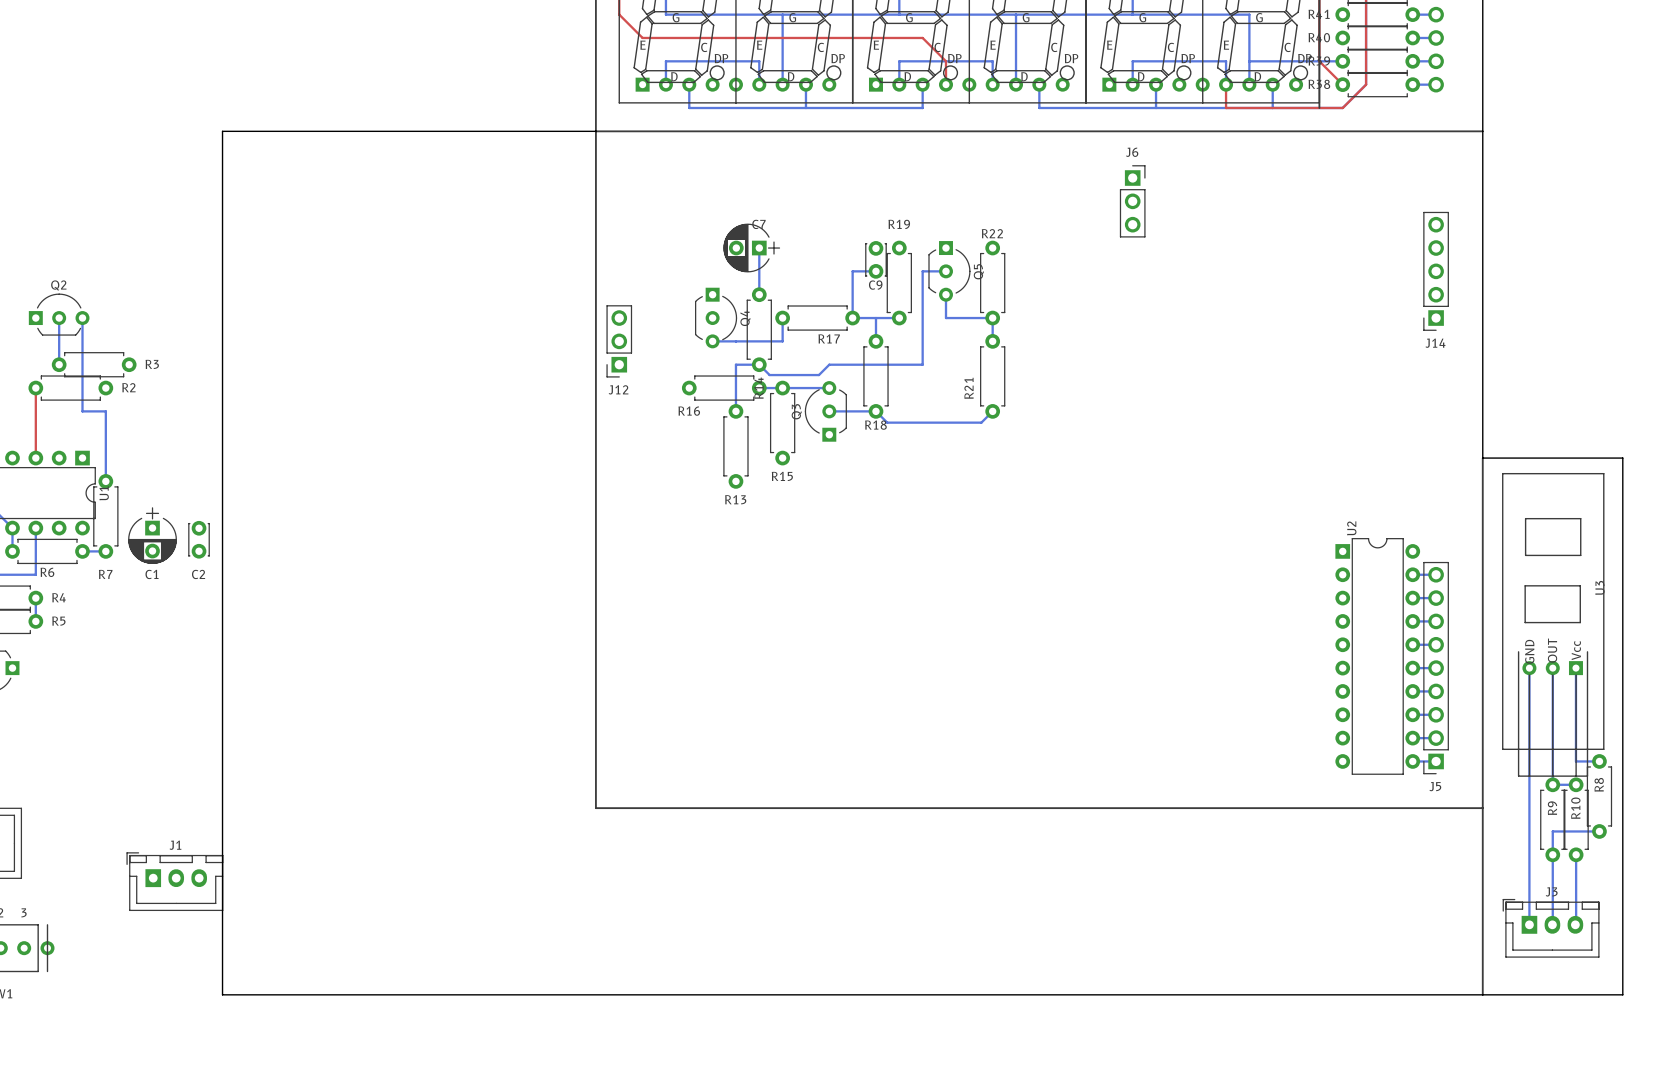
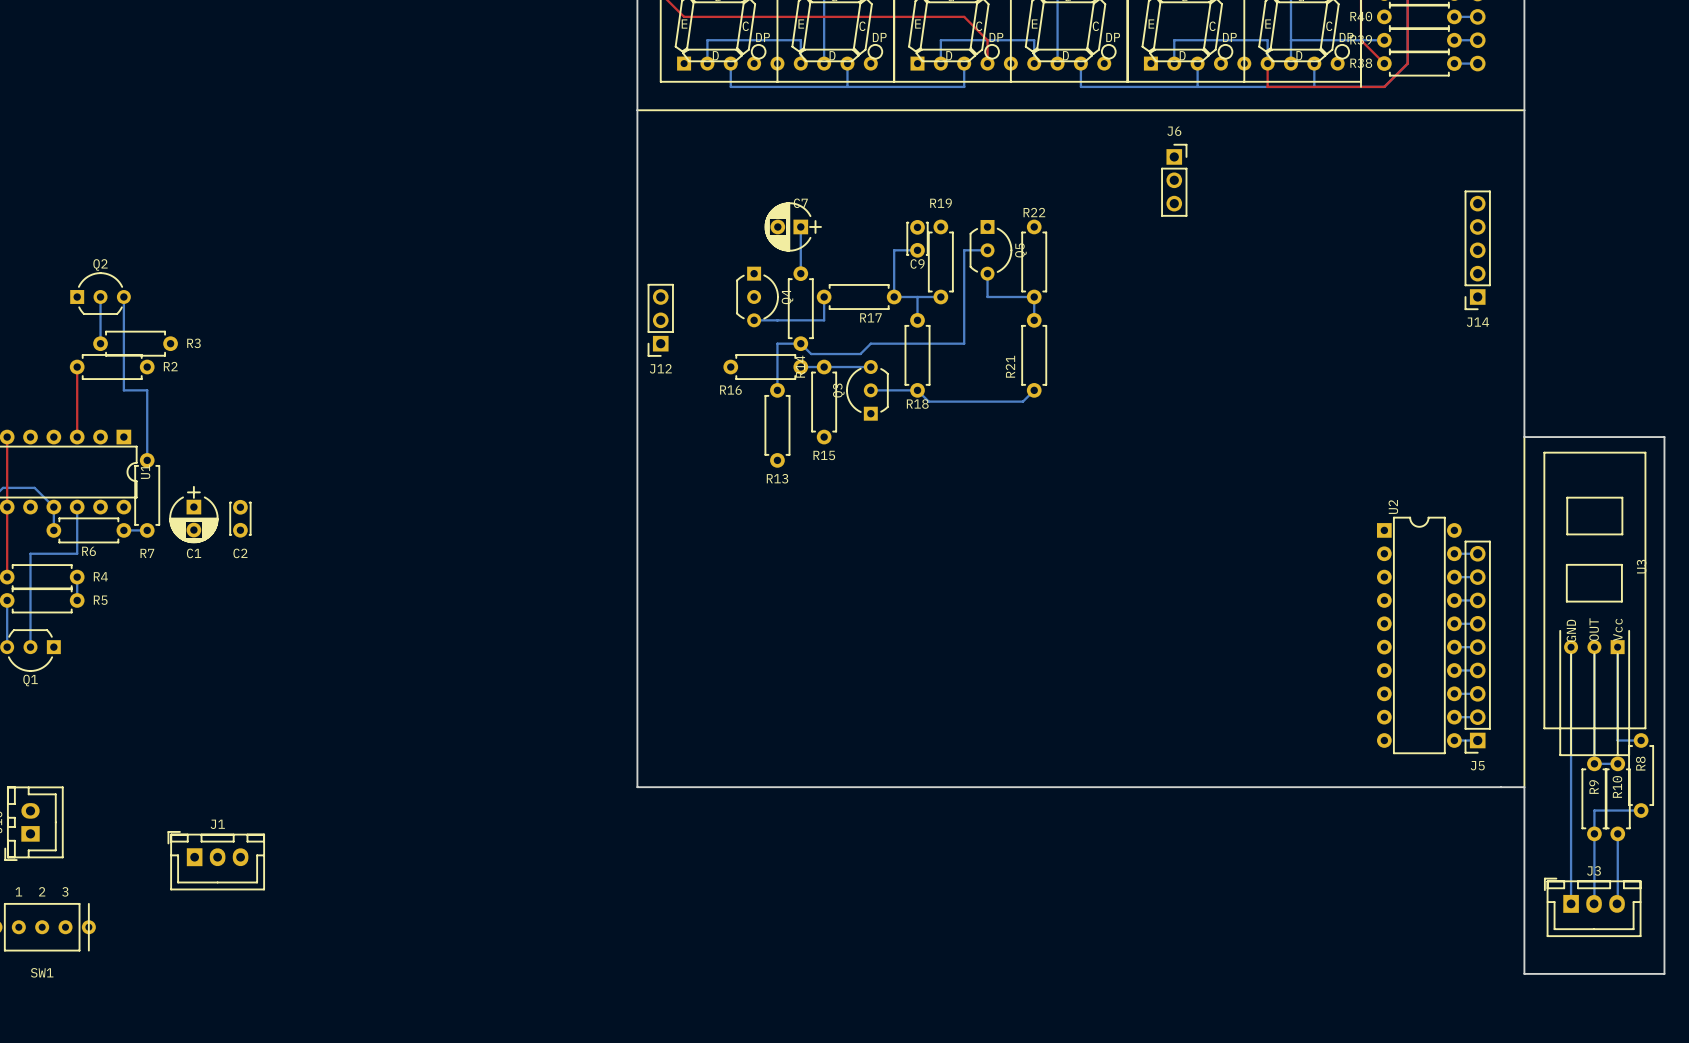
line: (595, 131) (595, 808) (1482, 808) (1482, 994) -> none
board edge: (595, 131) (222, 131) (222, 994) (1482, 994) -> (637, 110) (637, 787) (1524, 787) (1524, 973)

